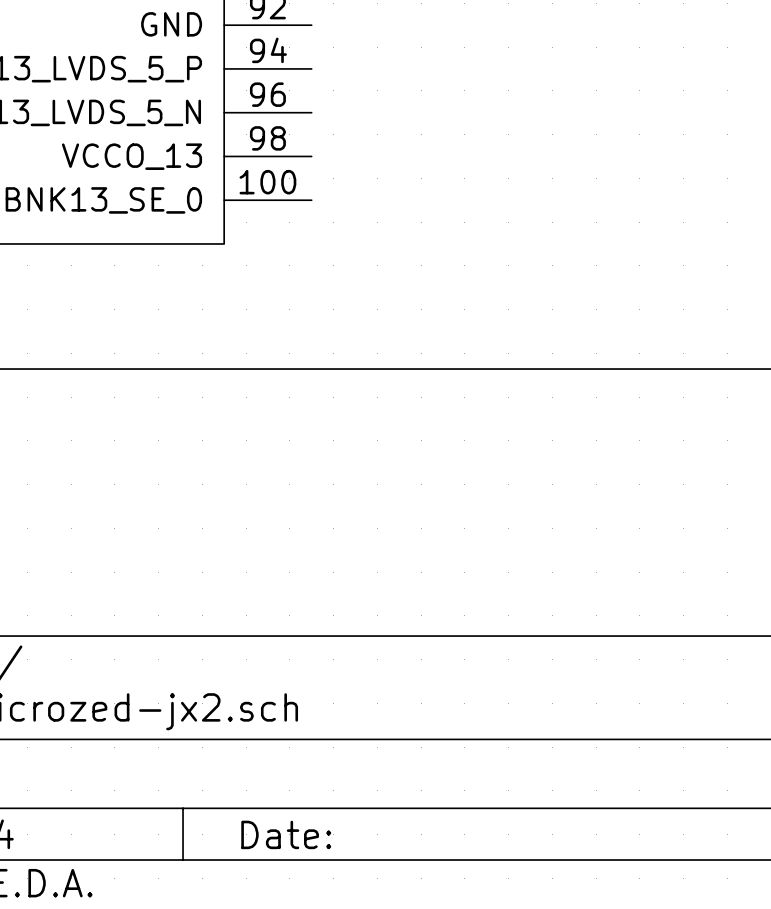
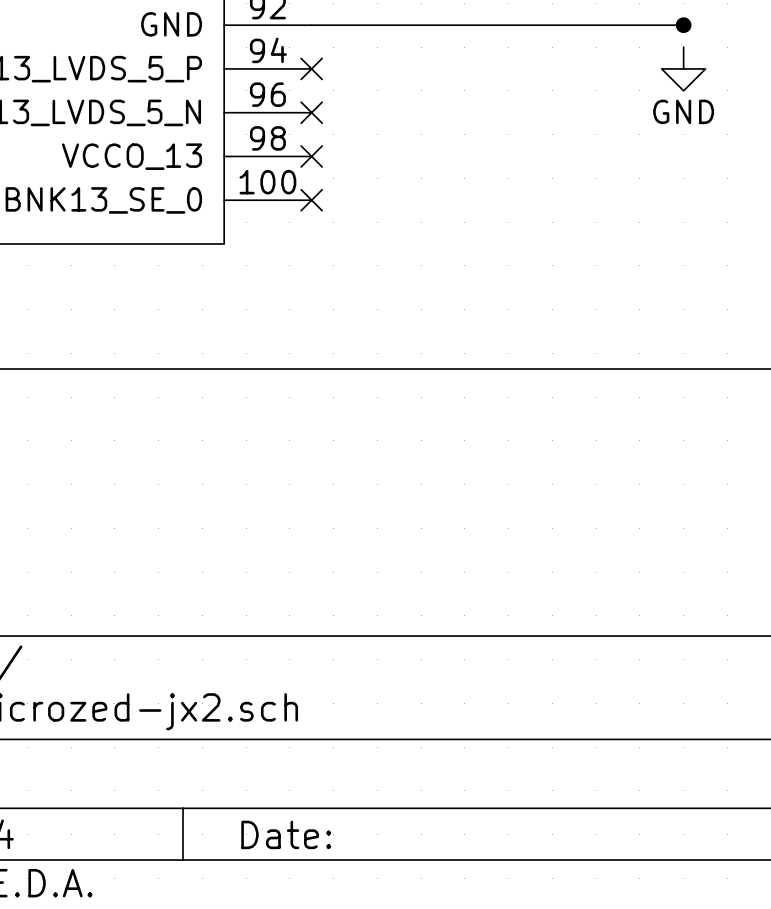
wire: none -> (311, 25) (683, 25)
junction: none -> (683, 25)
no-connect mark: none -> (311, 68)
power symbol: none -> GND (683, 68)
no-connect mark: none -> (311, 112)
no-connect mark: none -> (311, 156)
no-connect mark: none -> (311, 200)

